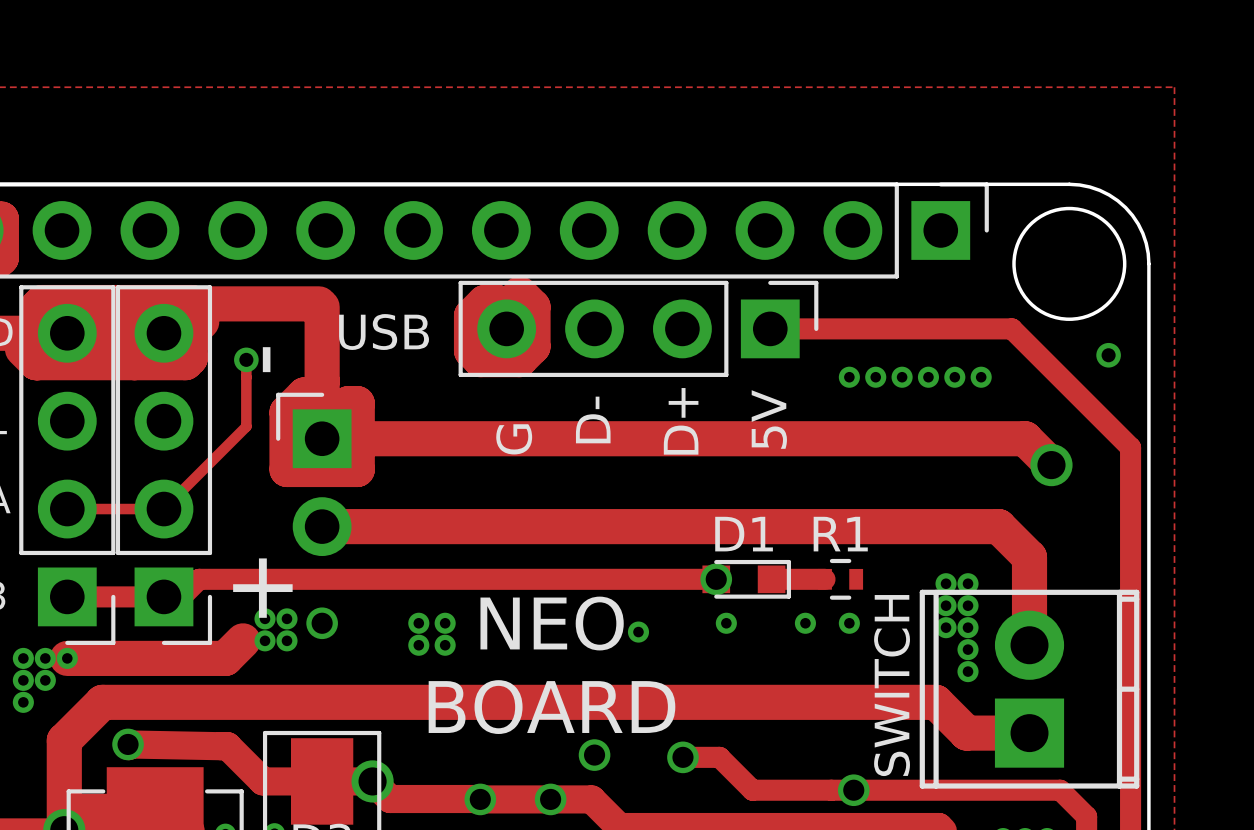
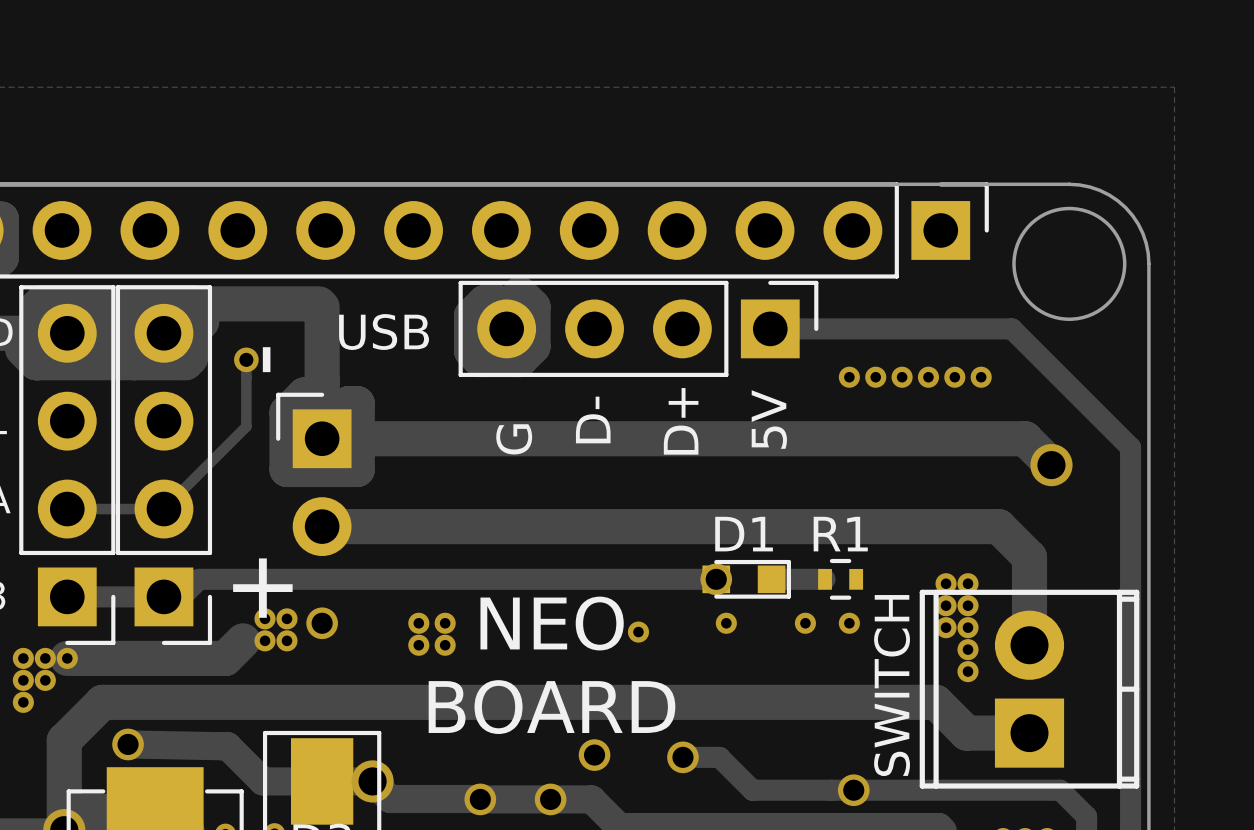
via: (1108, 355) -> none

